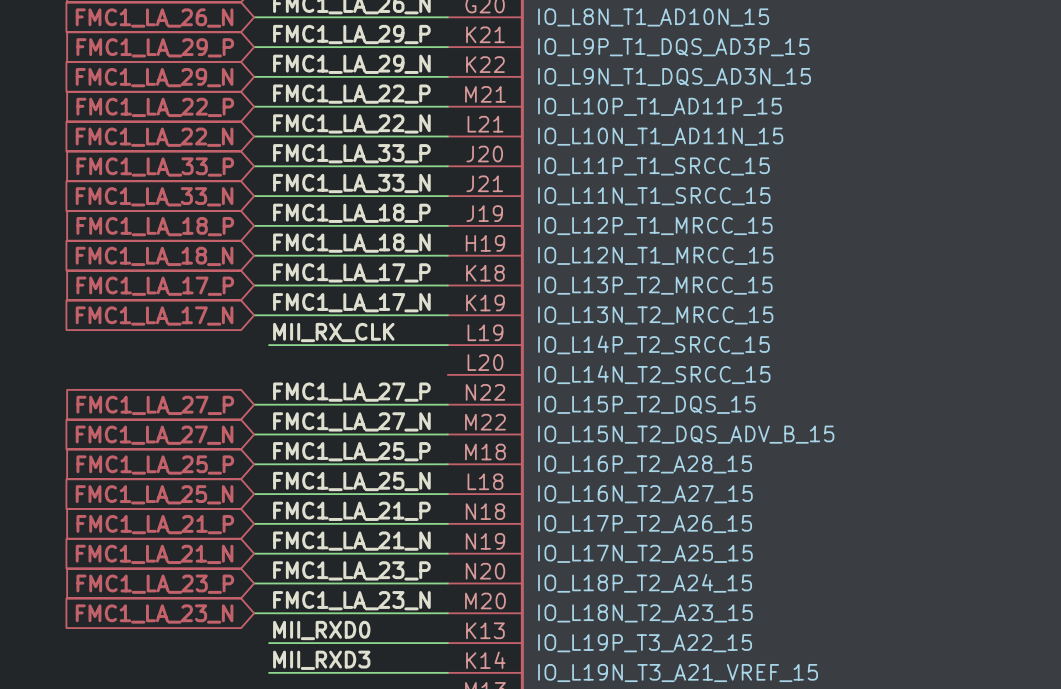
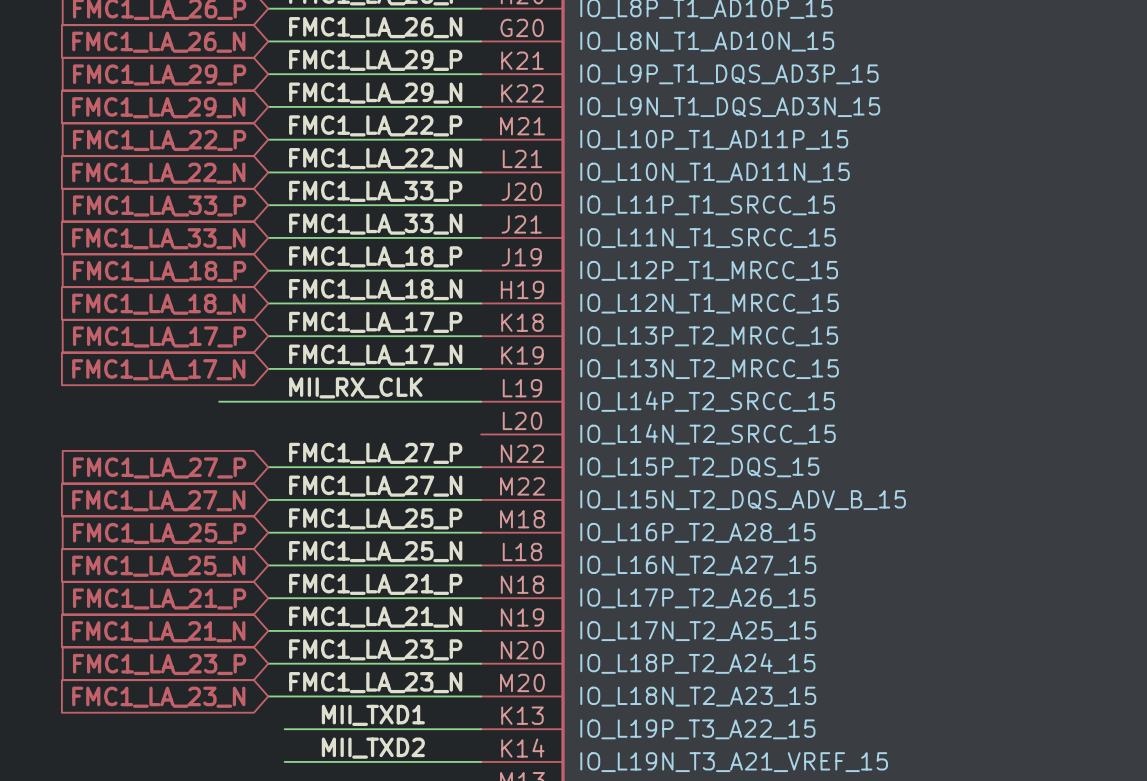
wire: none -> (219, 401) (284, 401)
label: MII_RXD0 (321, 630) -> none
label: none -> MII_TXD1 (373, 715)
label: MII_RXD3 (321, 660) -> none
label: none -> MII_TXD2 (373, 748)

